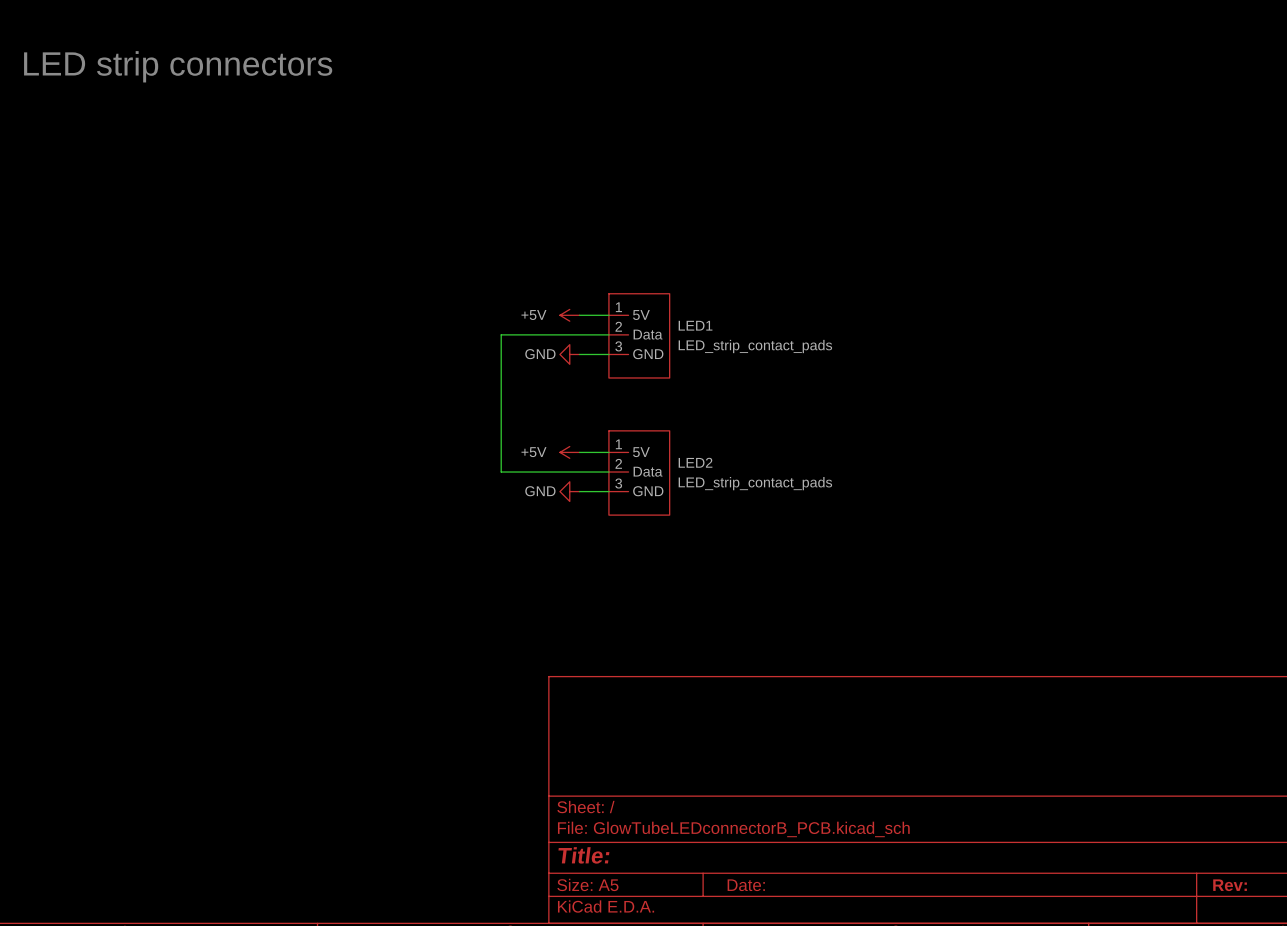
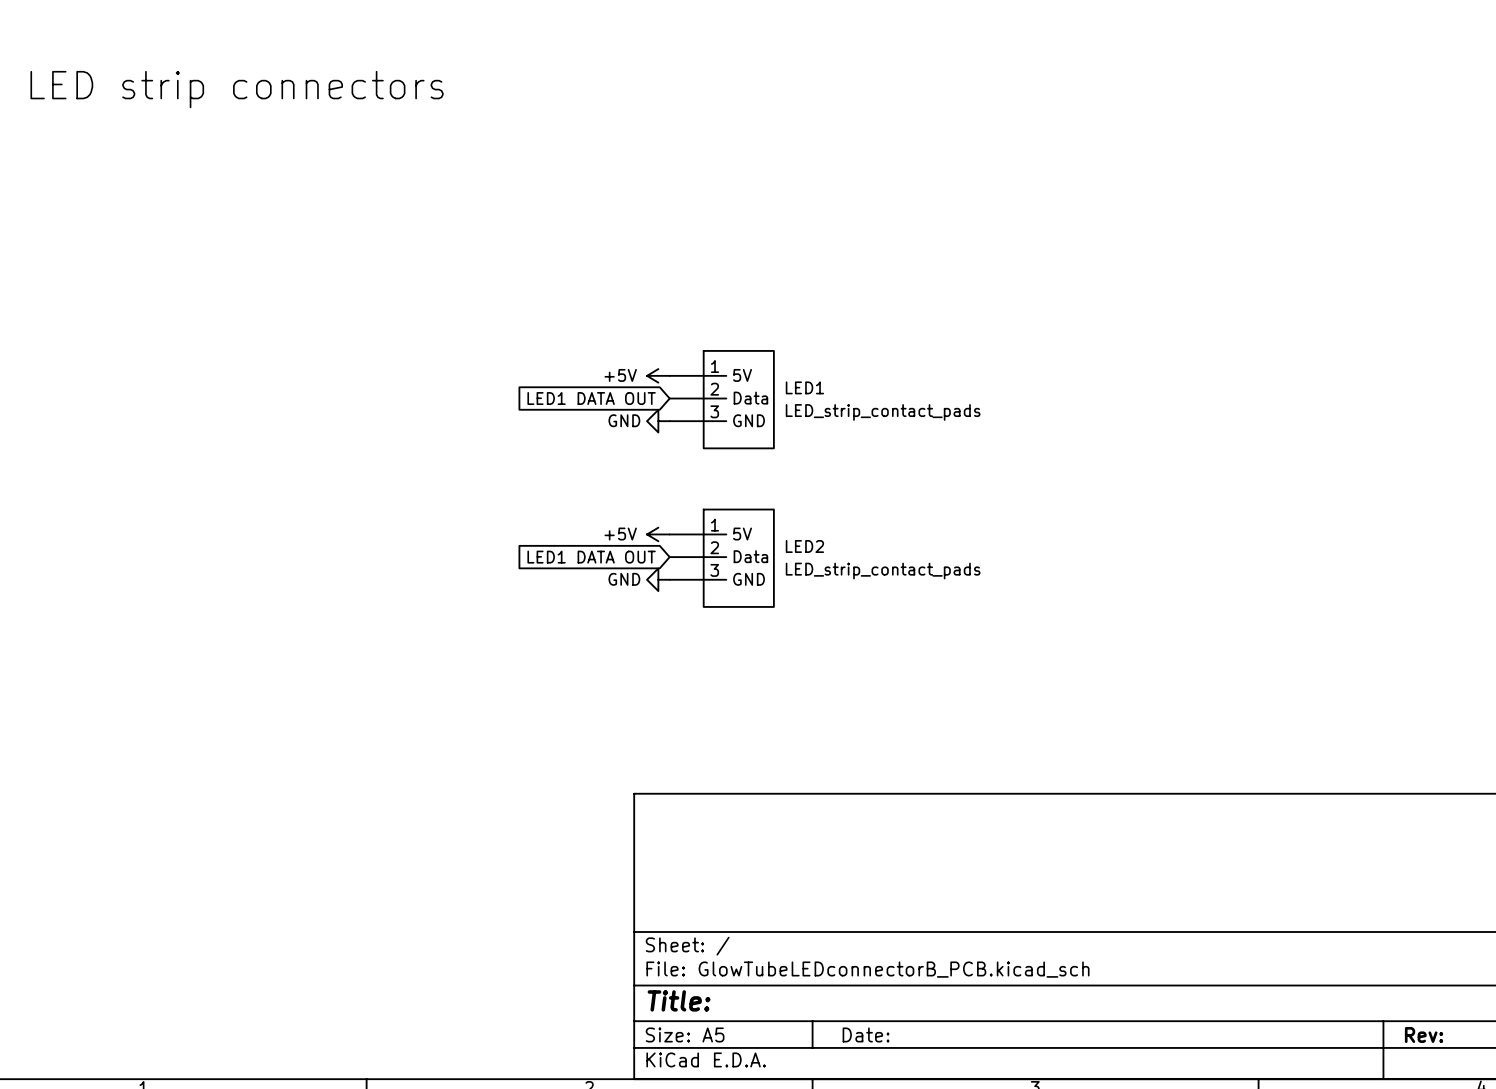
global label: none -> LED1 DATA OUT (591, 398)
wire: (579, 334) (501, 334) (501, 472) (579, 472) -> none
global label: none -> LED1 DATA OUT (591, 557)

